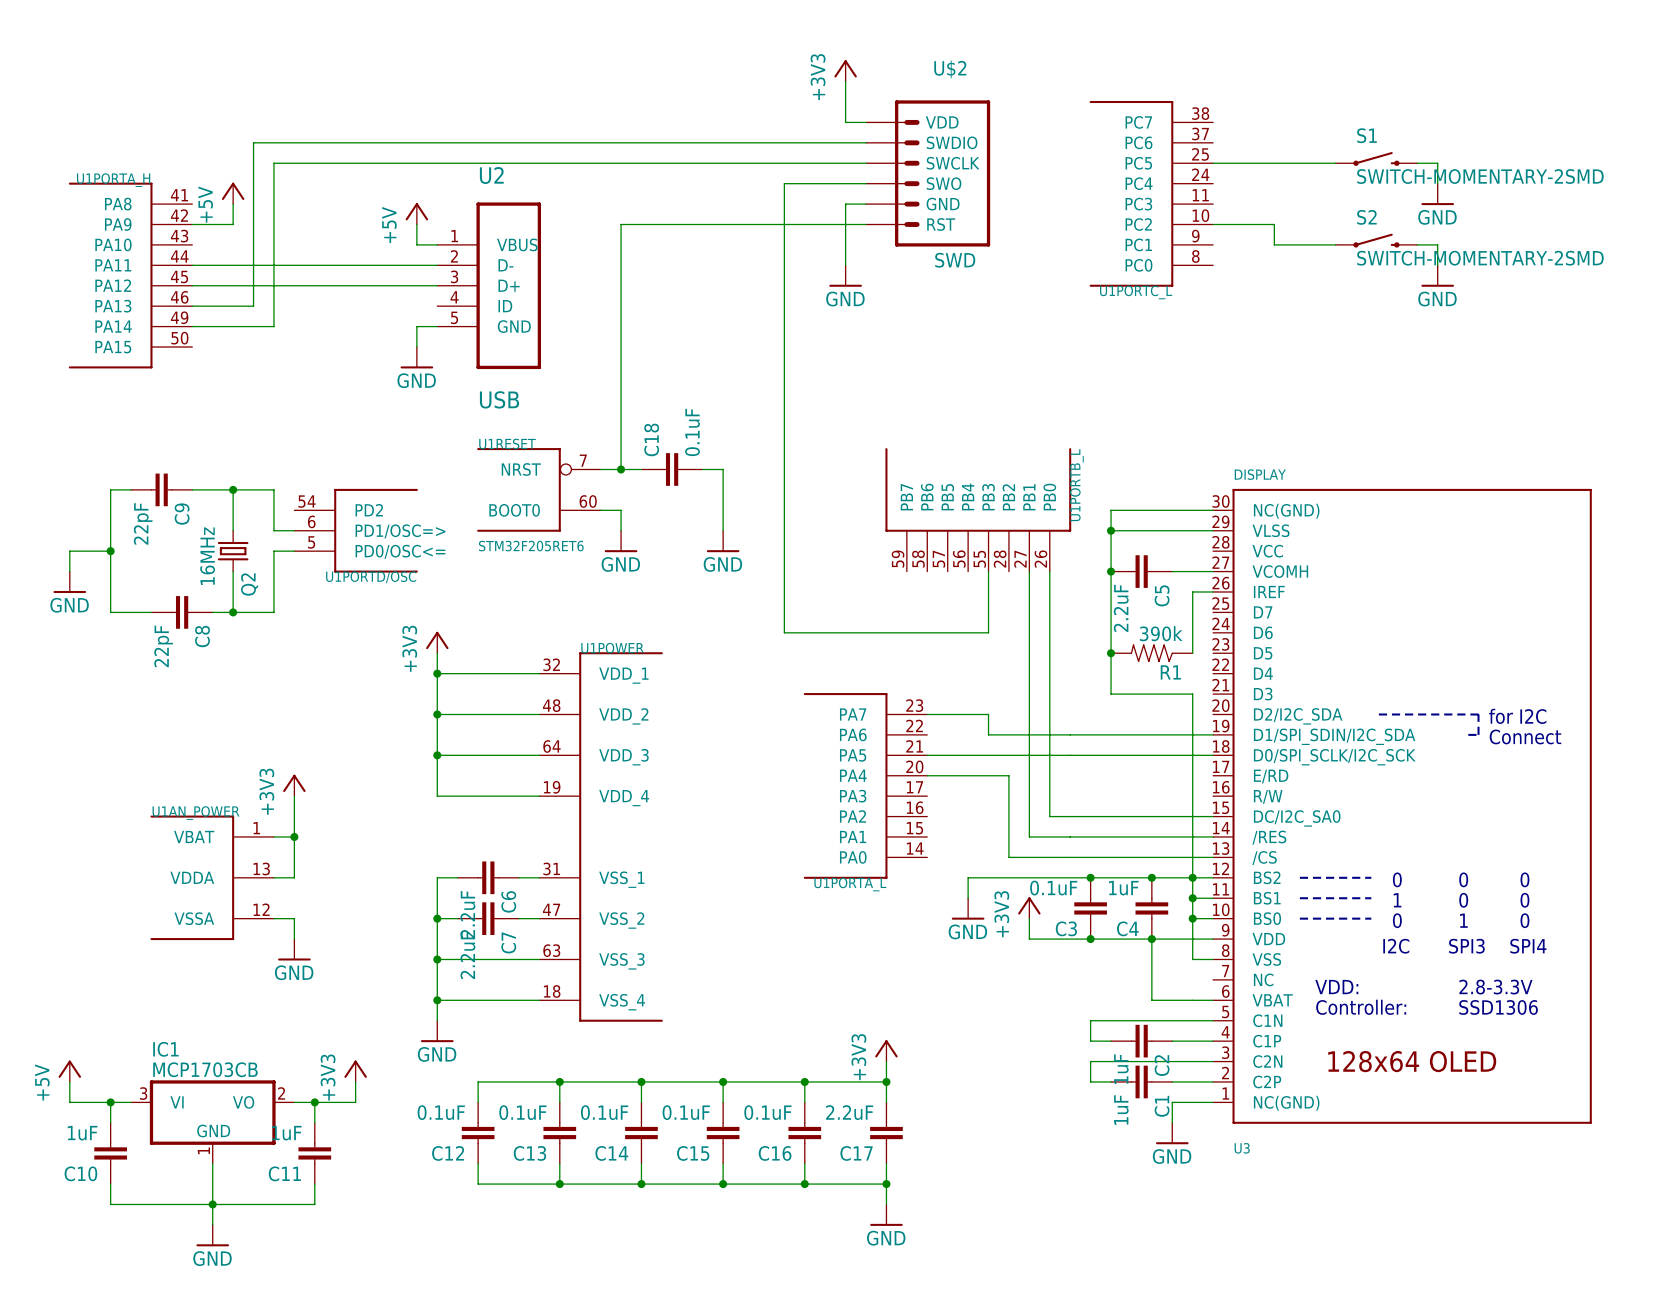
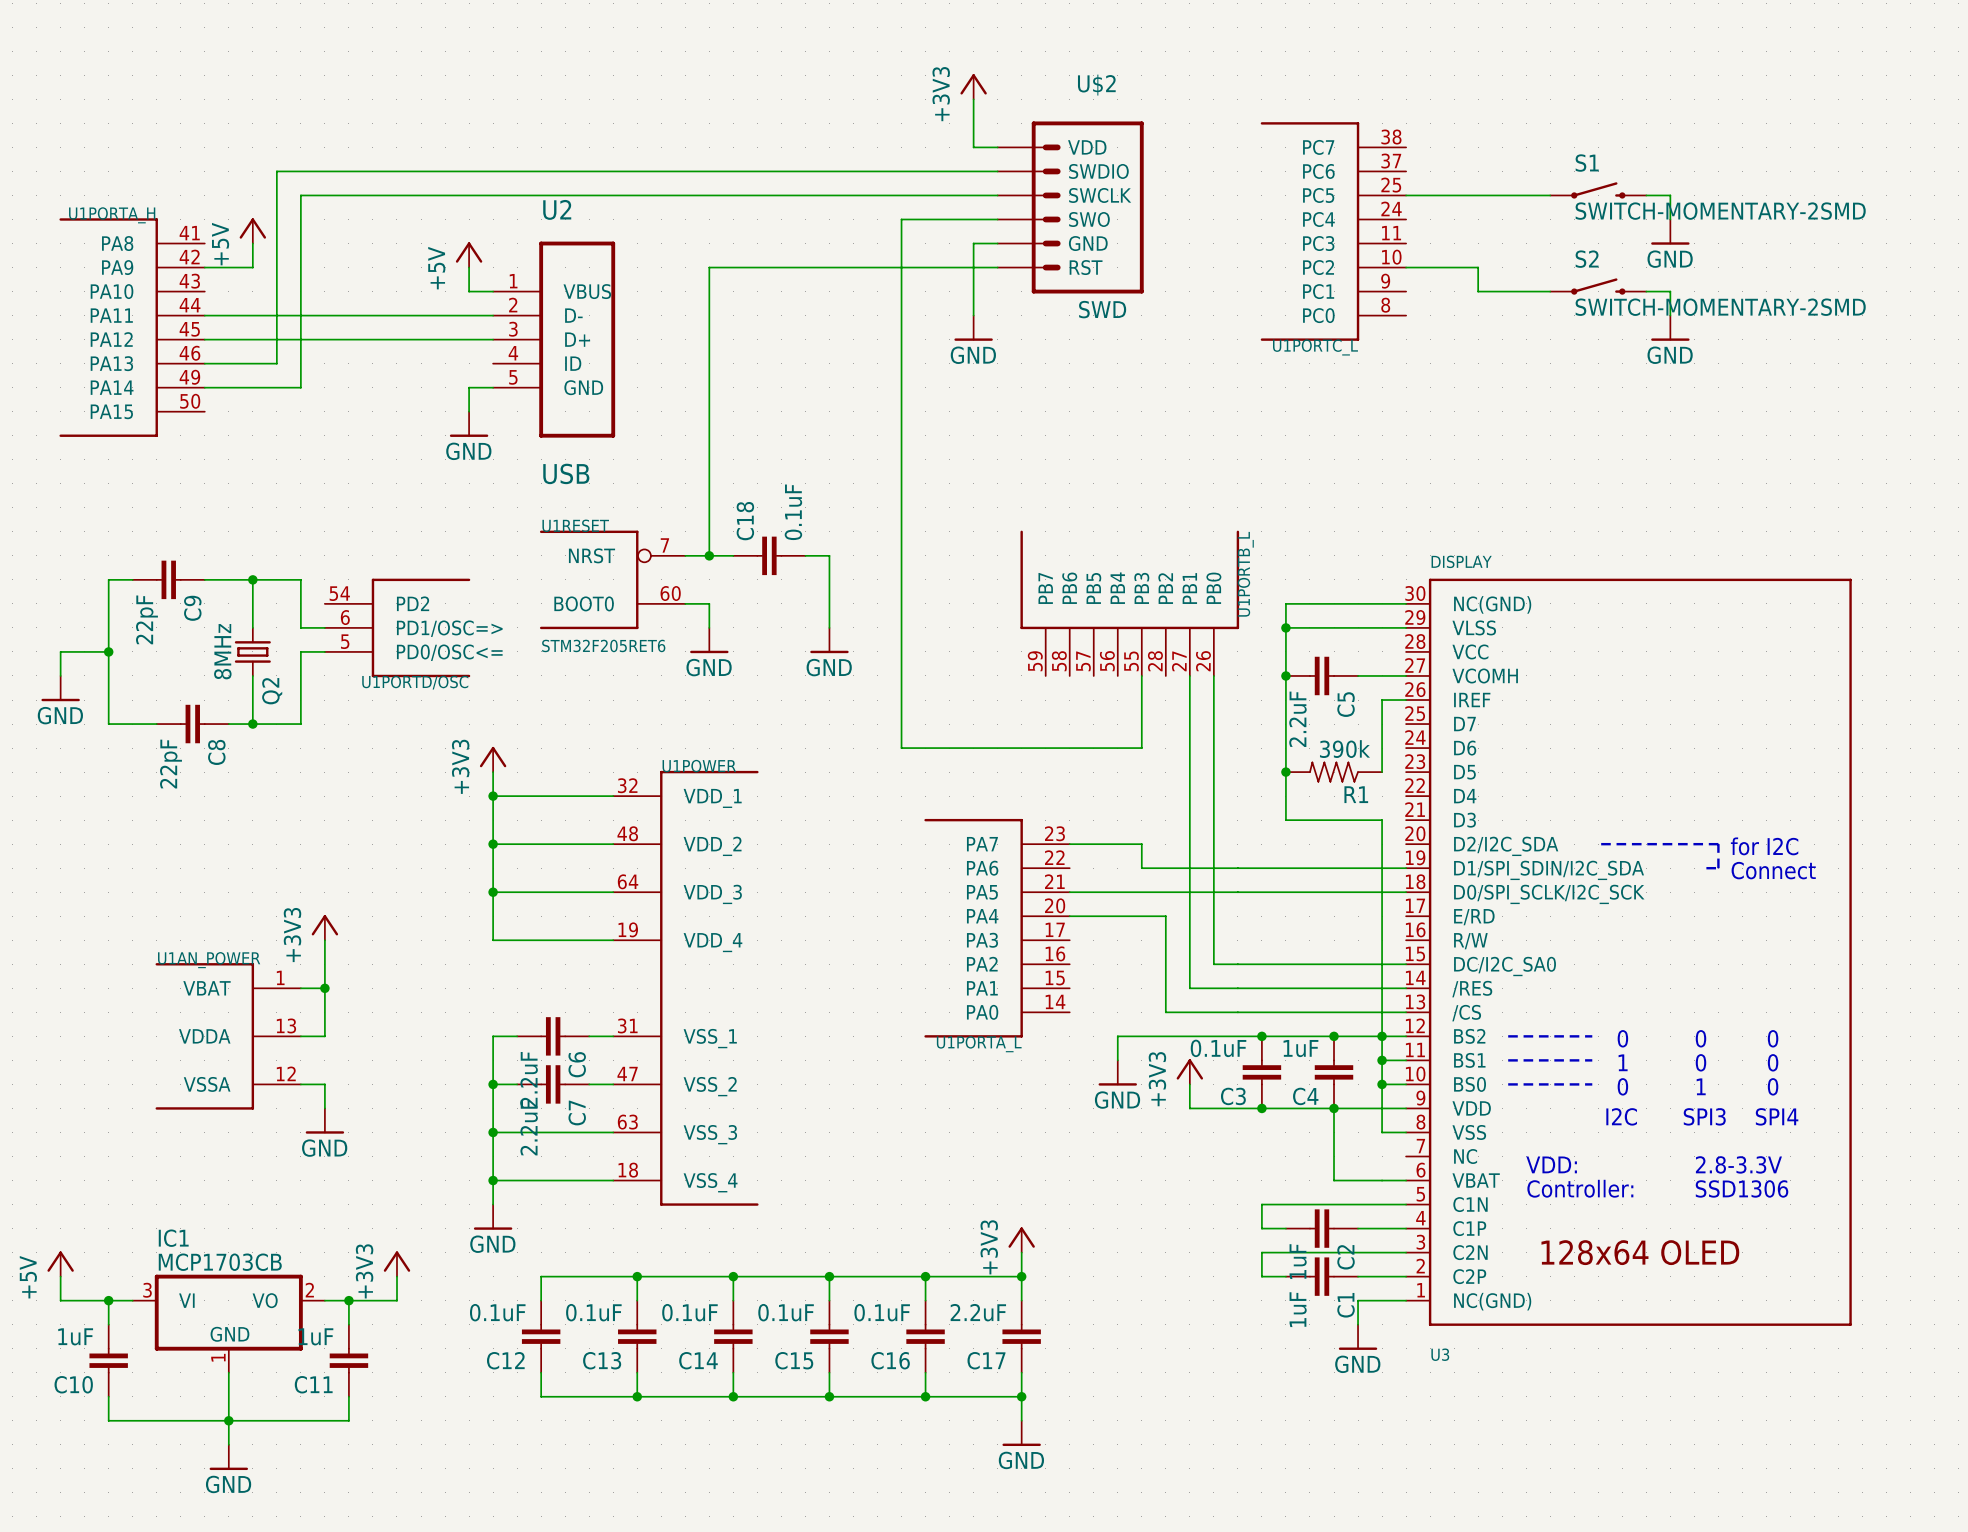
Q2 value: 16MHz (207, 556) -> 8MHz (222, 651)

